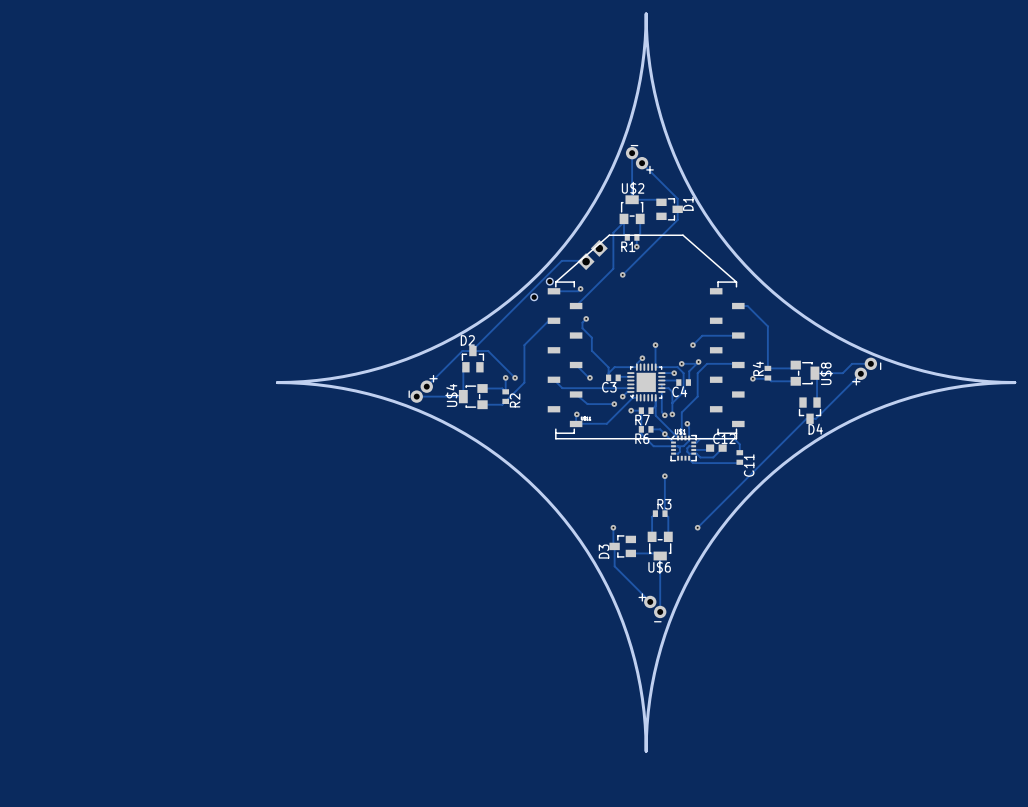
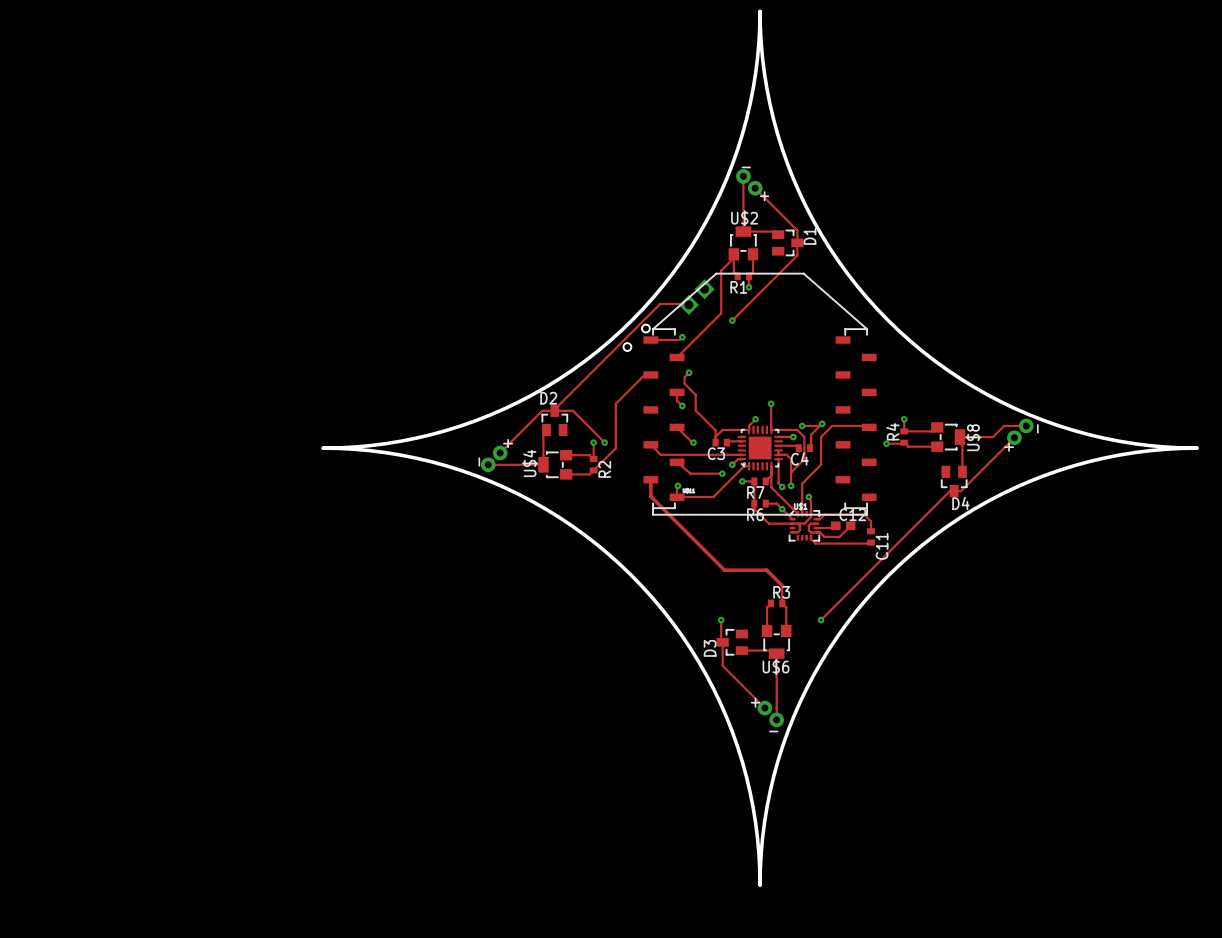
track: (738, 306) (747, 306) (767, 326) (767, 358) -> none
track: none -> (677, 392) (677, 400) (682, 406)
track: (738, 335) (702, 335) (692, 345) -> none
via: (692, 345) -> none
via: none -> (682, 406)
via: none -> (904, 419)
track: (664, 476) (664, 498) -> (650, 479) (650, 496) (724, 570) (766, 570) (782, 585)
via: (664, 476) -> none

